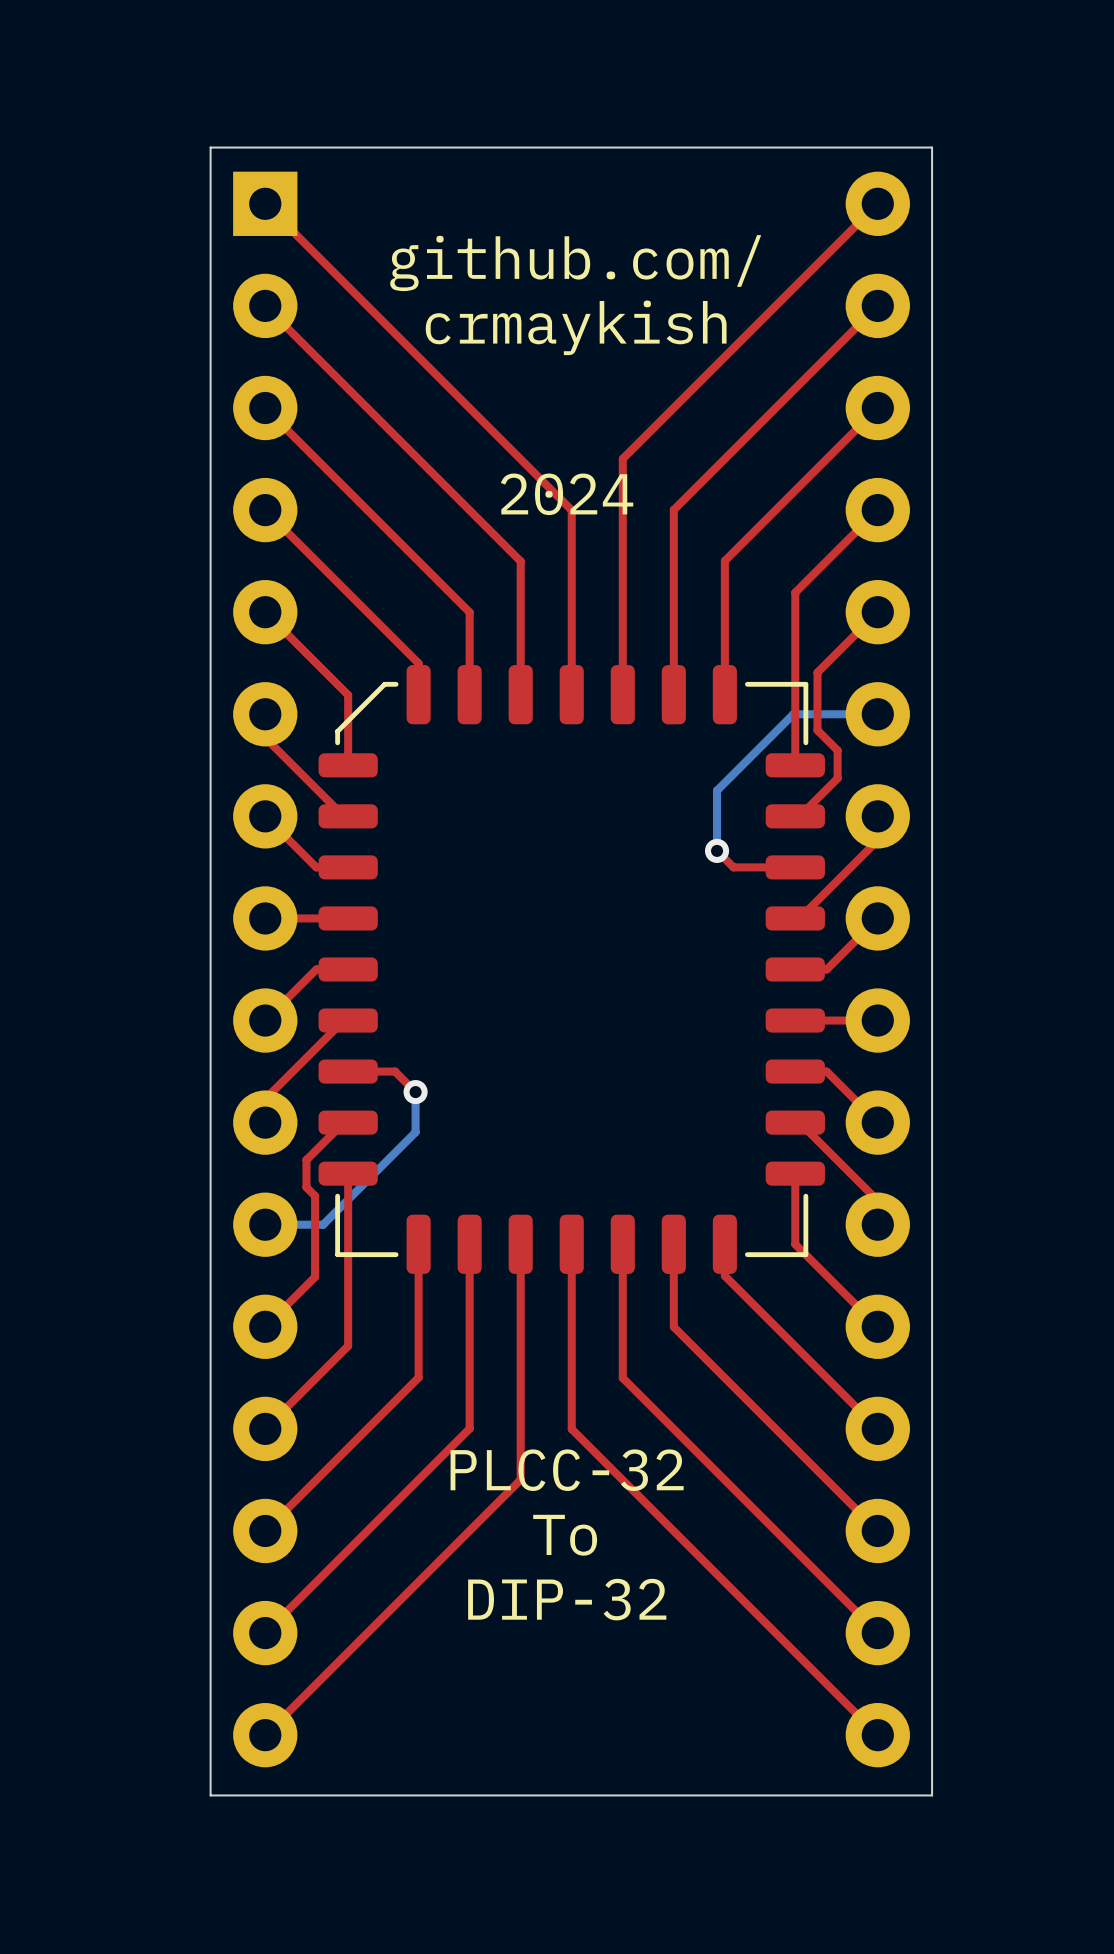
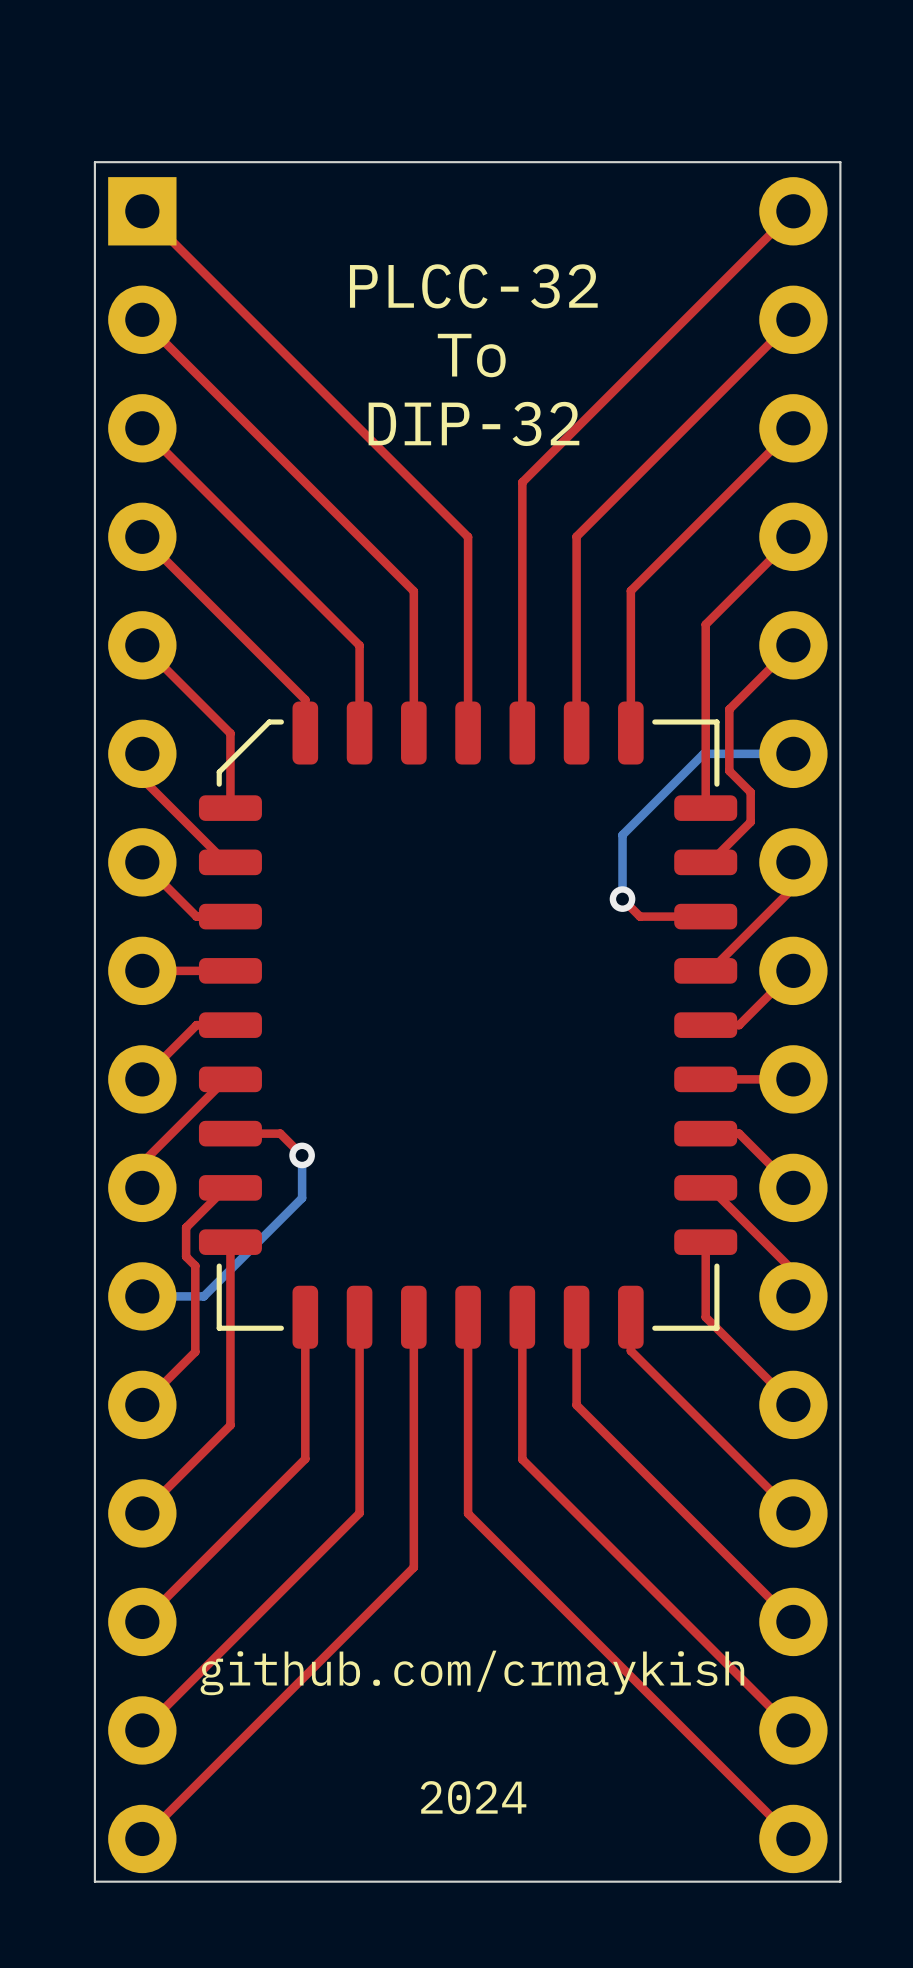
board edge: (210, 147) (932, 147) (932, 1795) (210, 1795) (210, 147) -> (94, 162) (94, 1881) (840, 1881) (840, 162) (94, 162)
text: github.com/ (575, 263) -> PLCC-32 (473, 286)
text: crmaykish (576, 327) -> To (471, 355)
text: none -> DIP-32 (473, 423)
text: 2024 (567, 494) -> none
text: PLCC-32 (567, 1470) -> none
text: To (565, 1535) -> none
text: none -> github.com/crmaykish (472, 1672)
text: DIP-32 (567, 1599) -> none
text: none -> 2024 (473, 1797)

